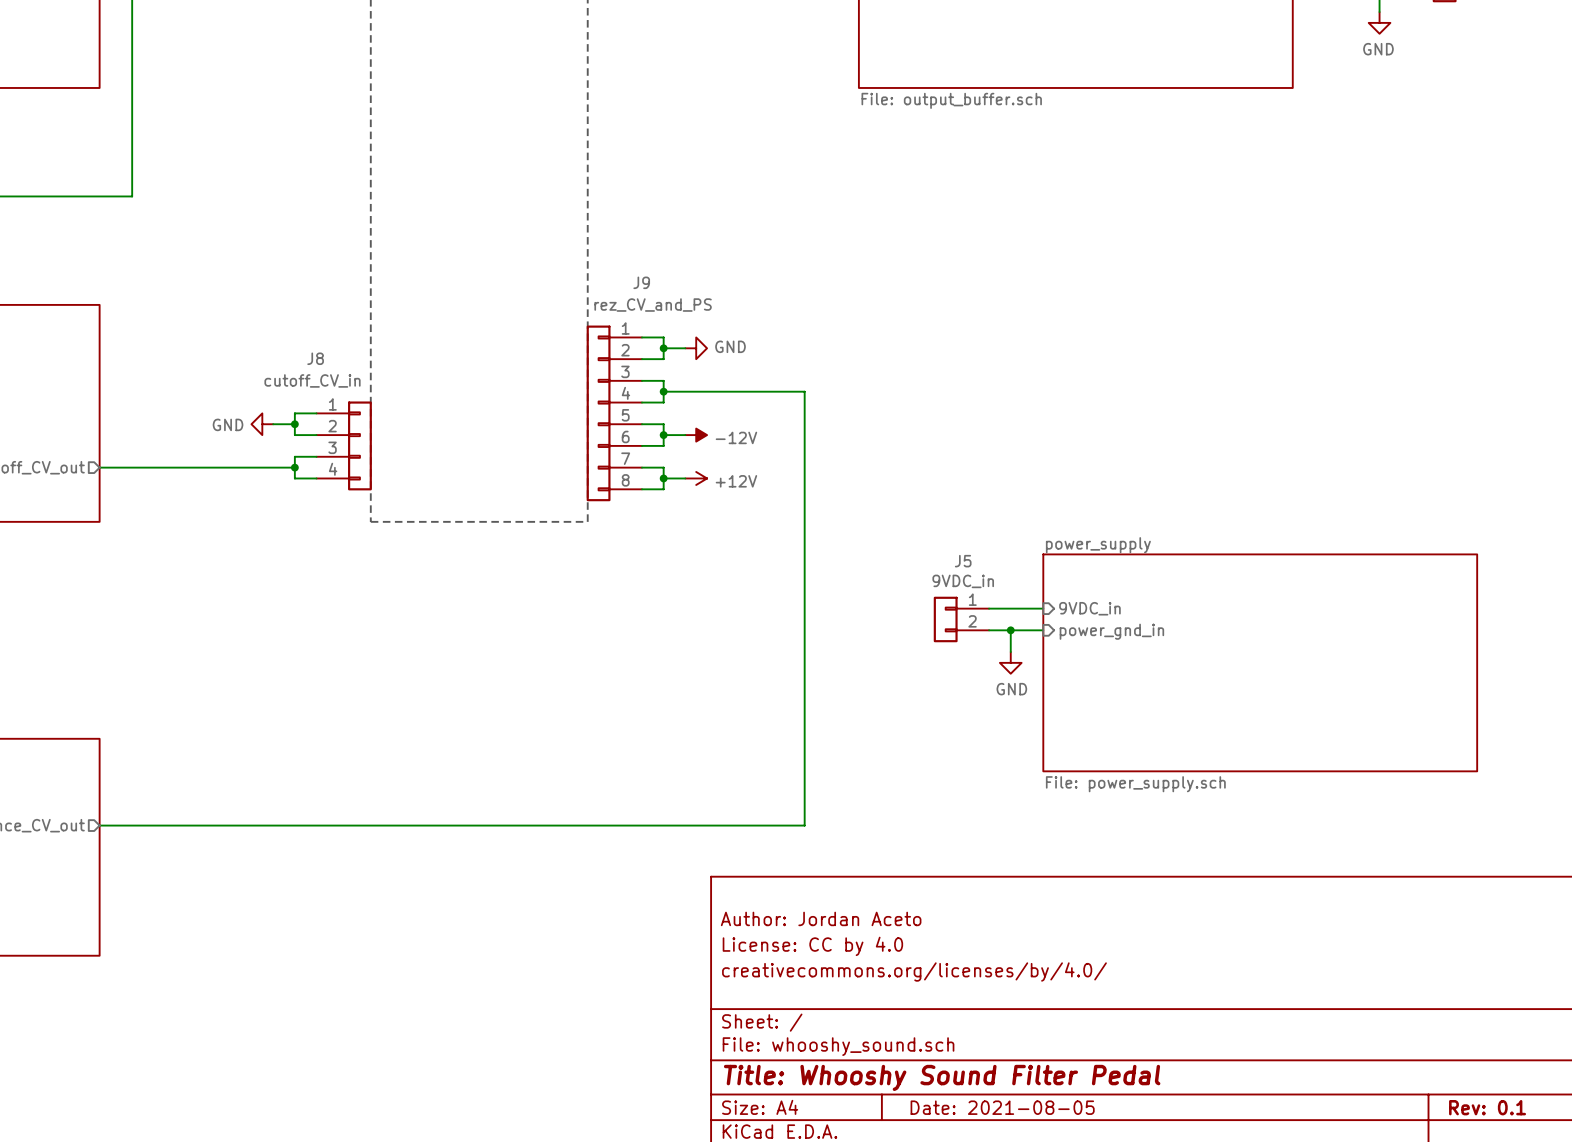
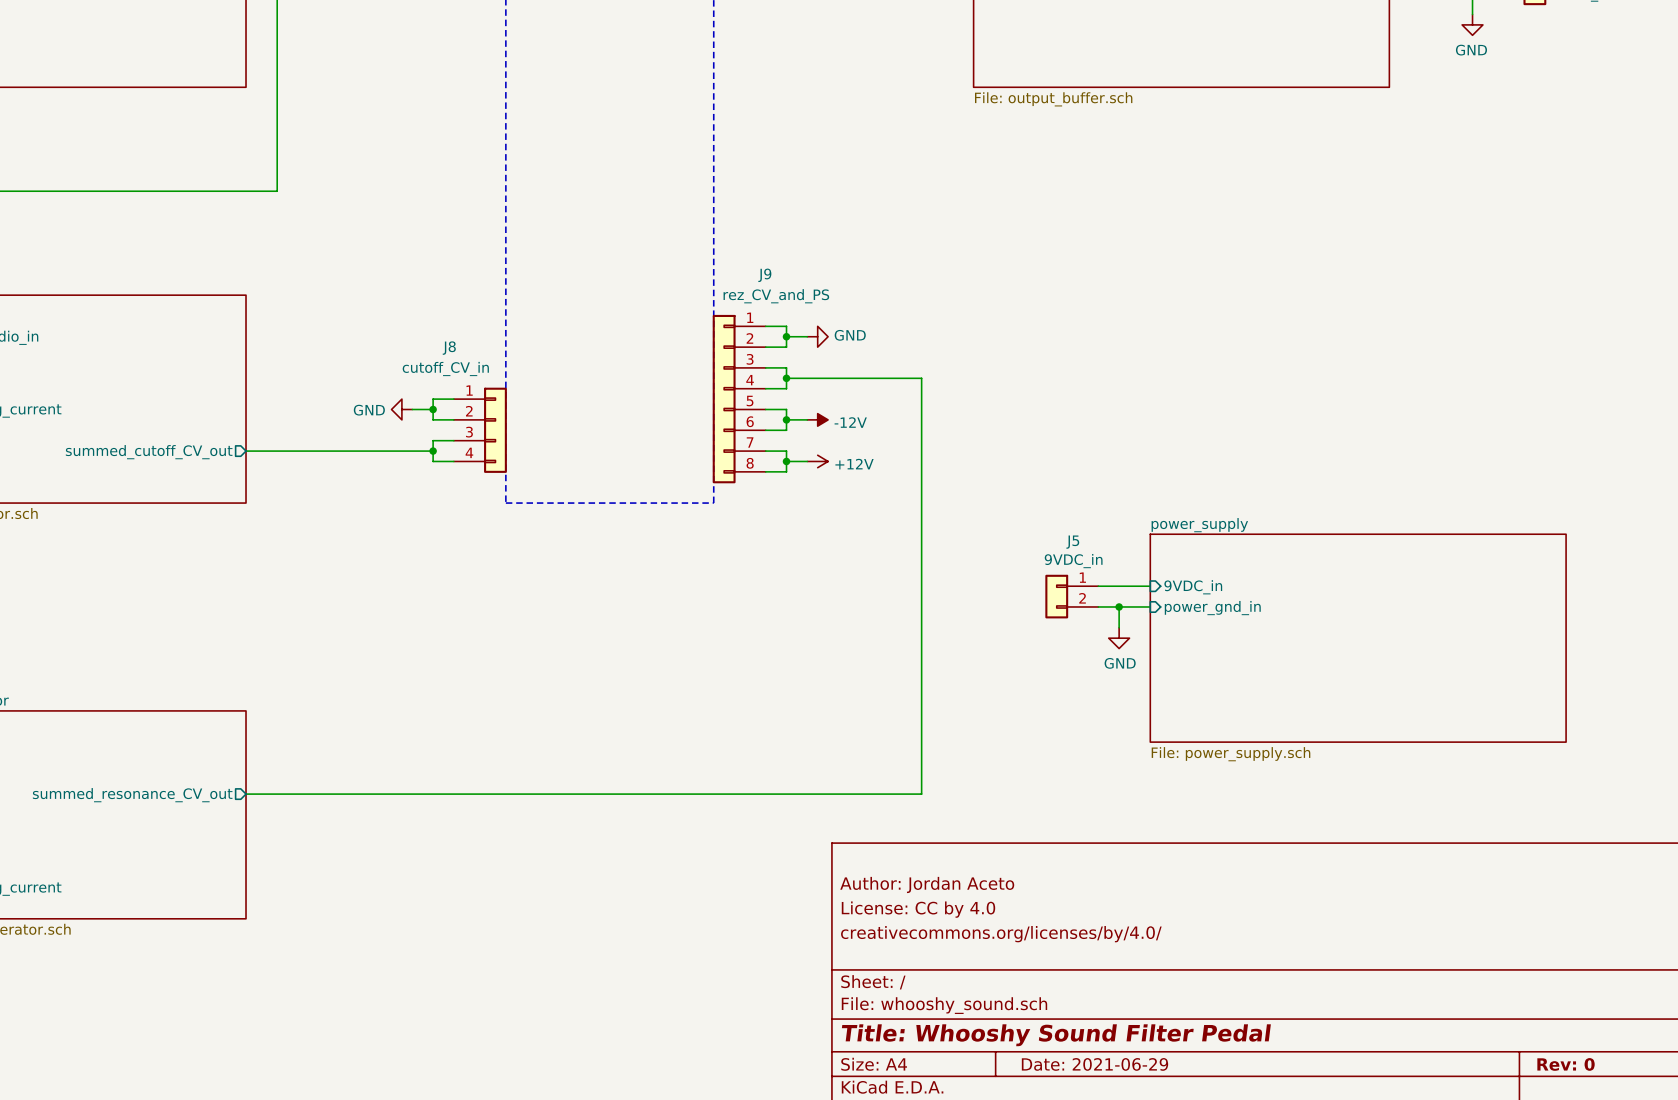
title block: Date: 2021-08-05 (1002, 1107) -> Date: 2021-06-29 (1094, 1064)
title block: Rev: 0.1 (1487, 1107) -> Rev: 0 (1566, 1064)

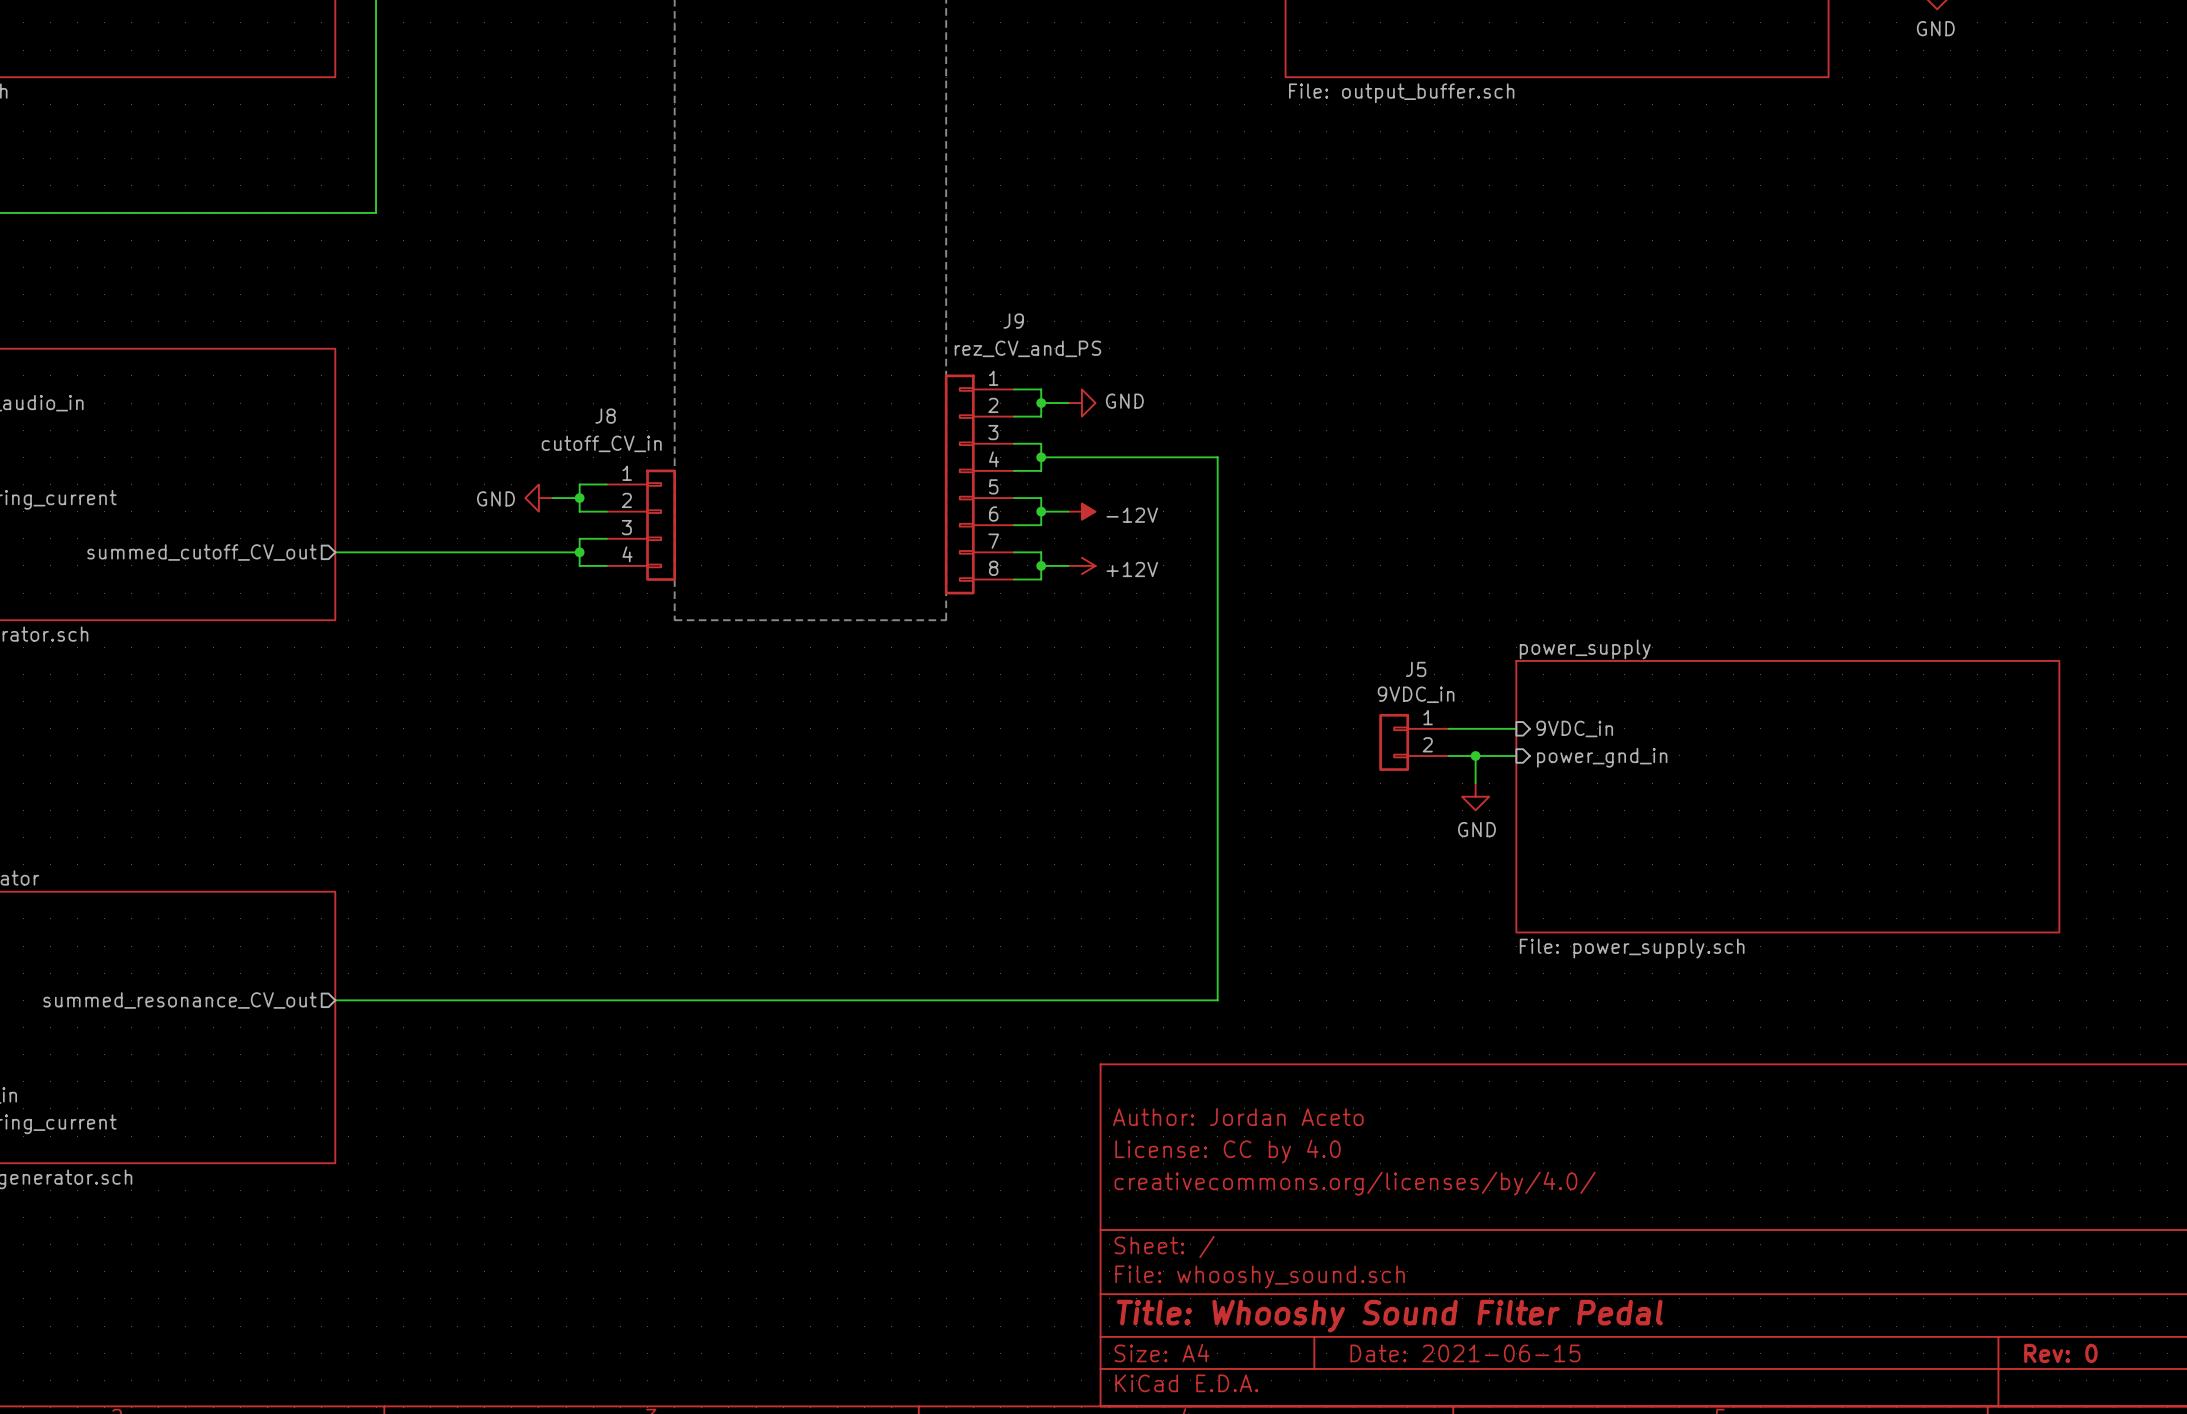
title block: Date: 2021-06-29 (1094, 1064) -> Date: 2021-06-15 (1465, 1353)

